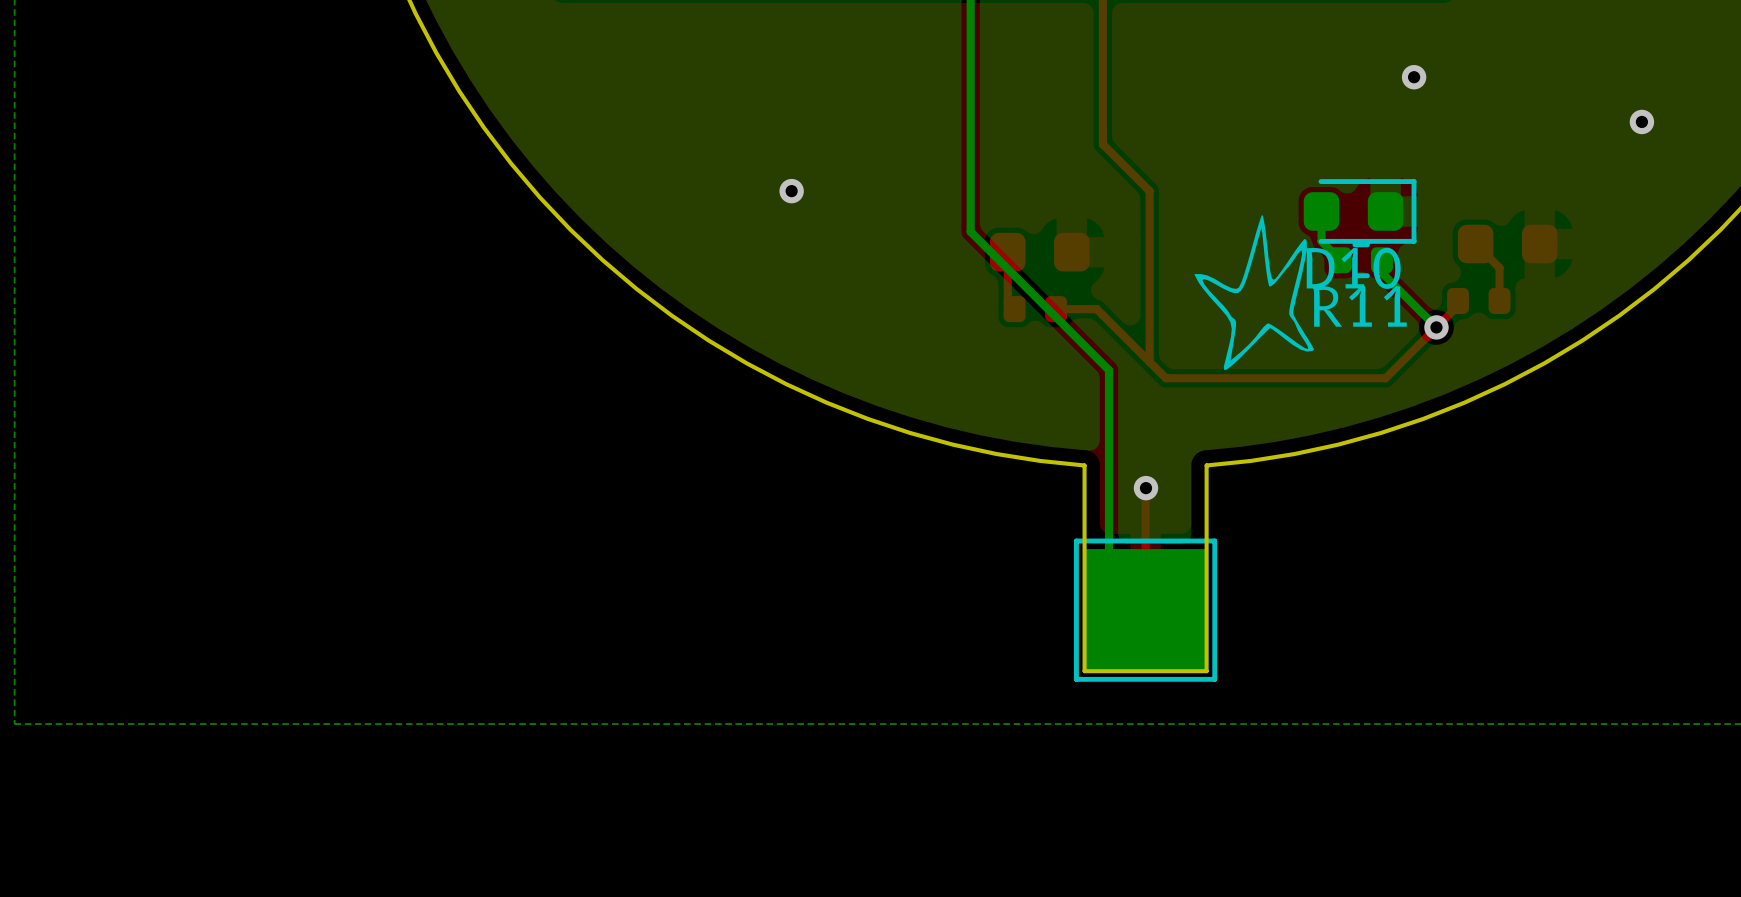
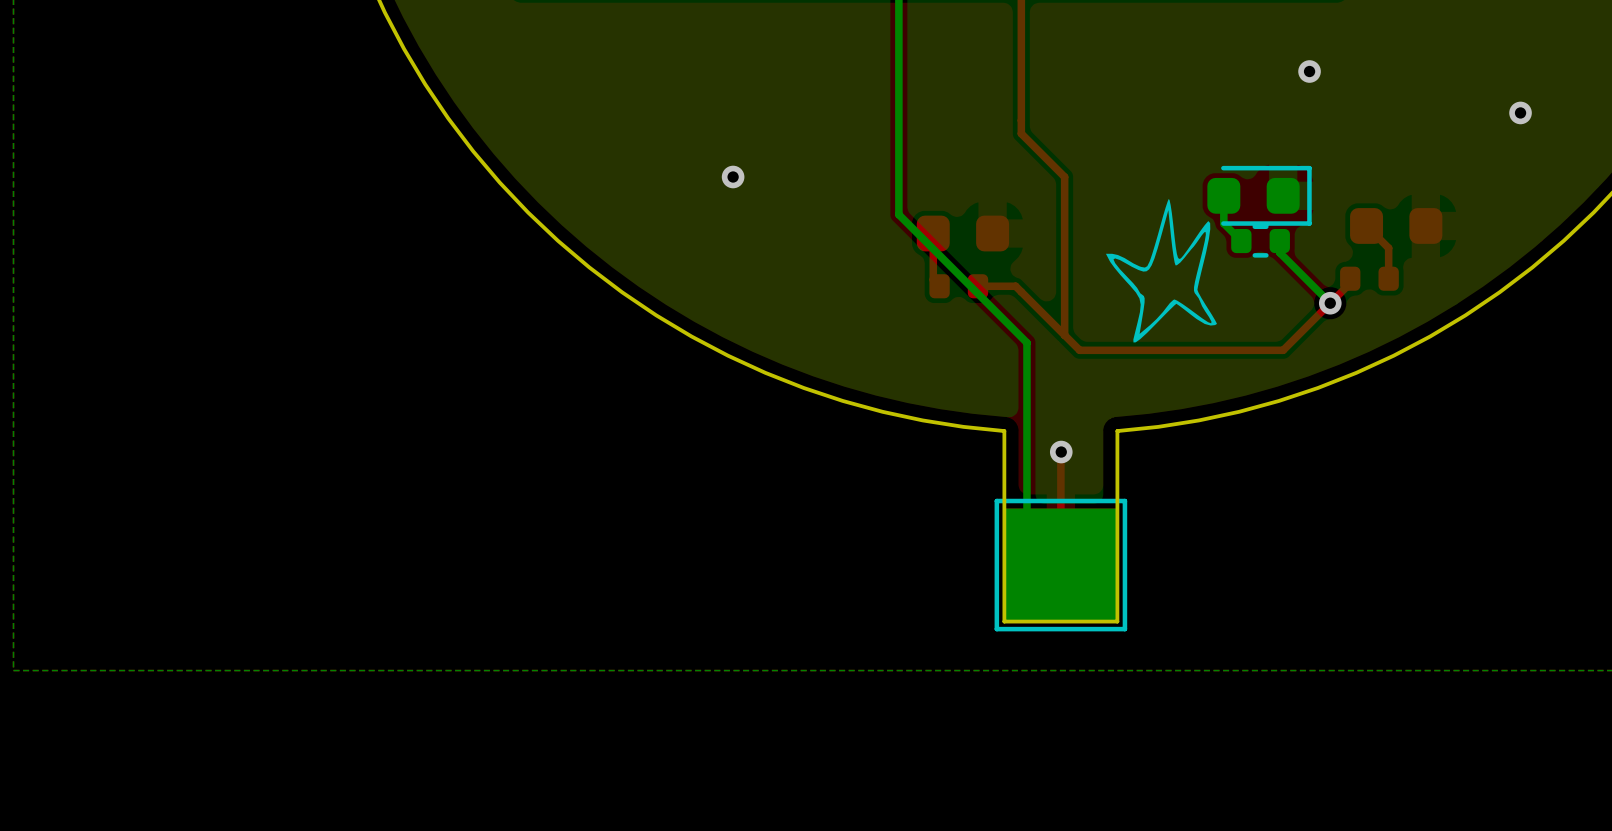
D10 name: D10 (1353, 268) -> none
R11 name: R11 (1359, 306) -> none

